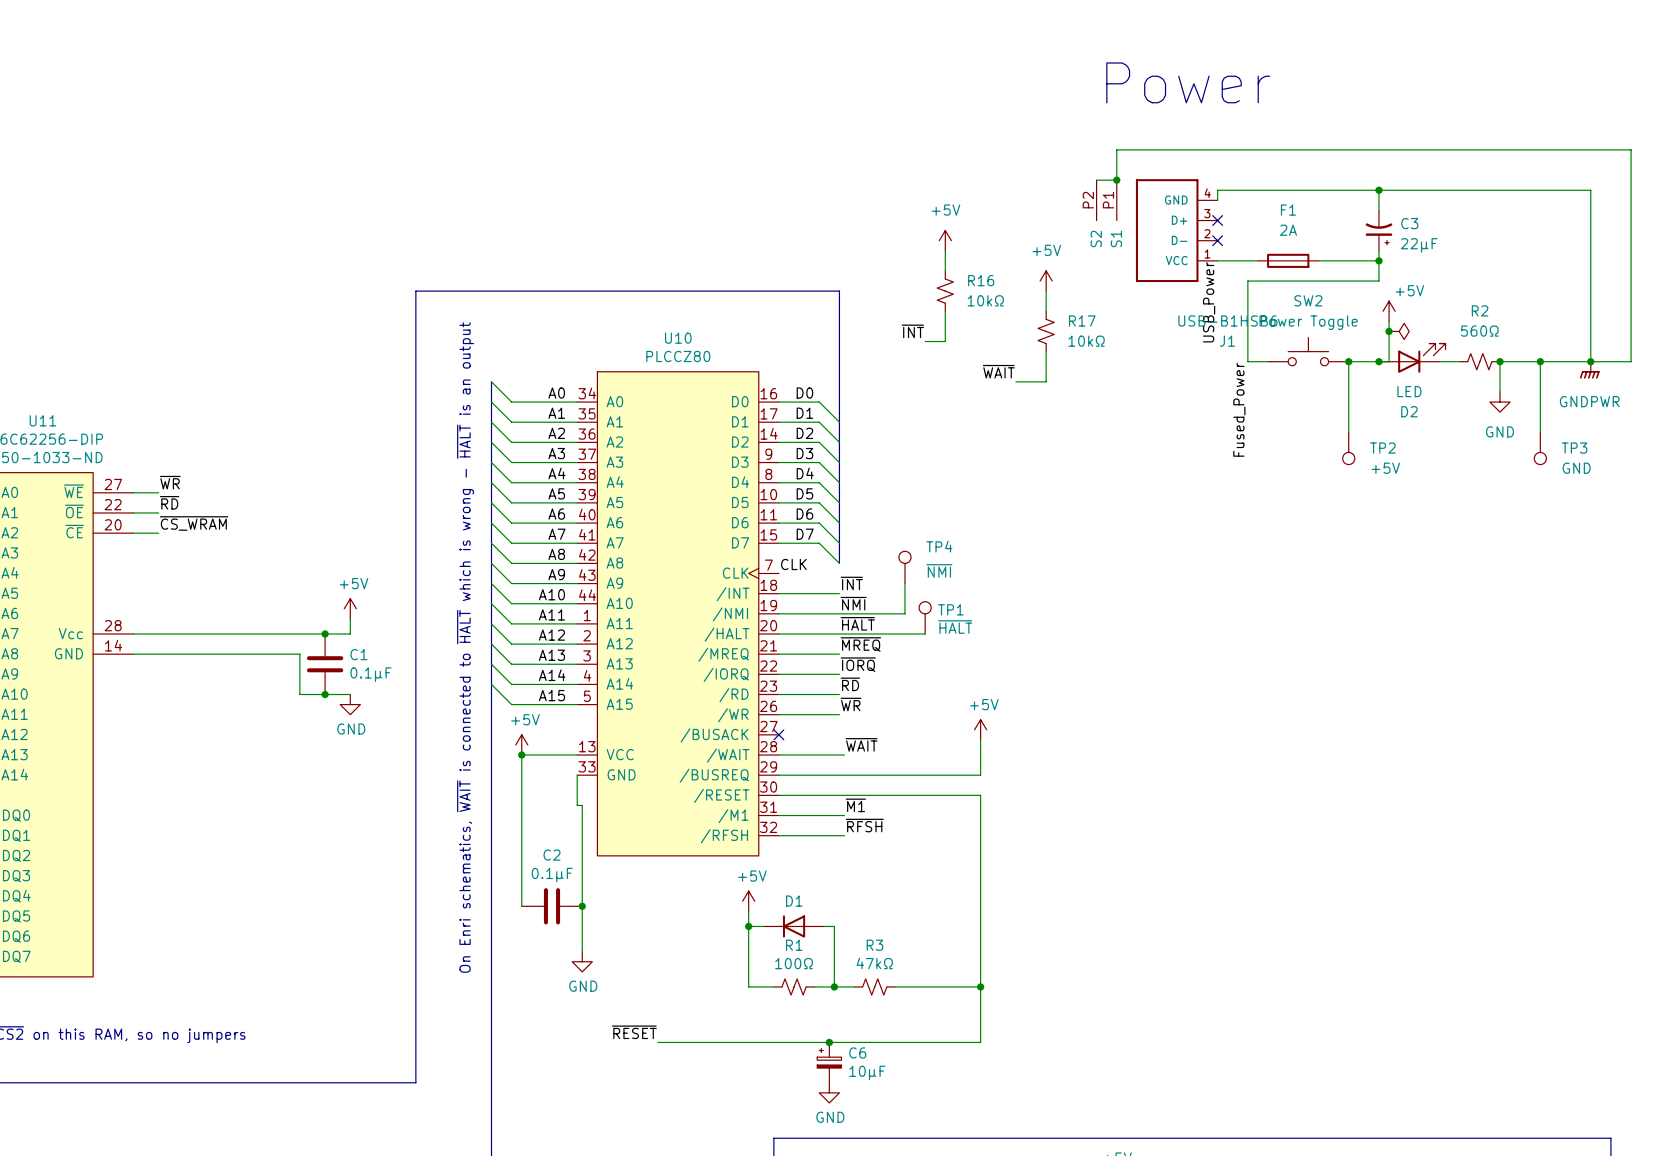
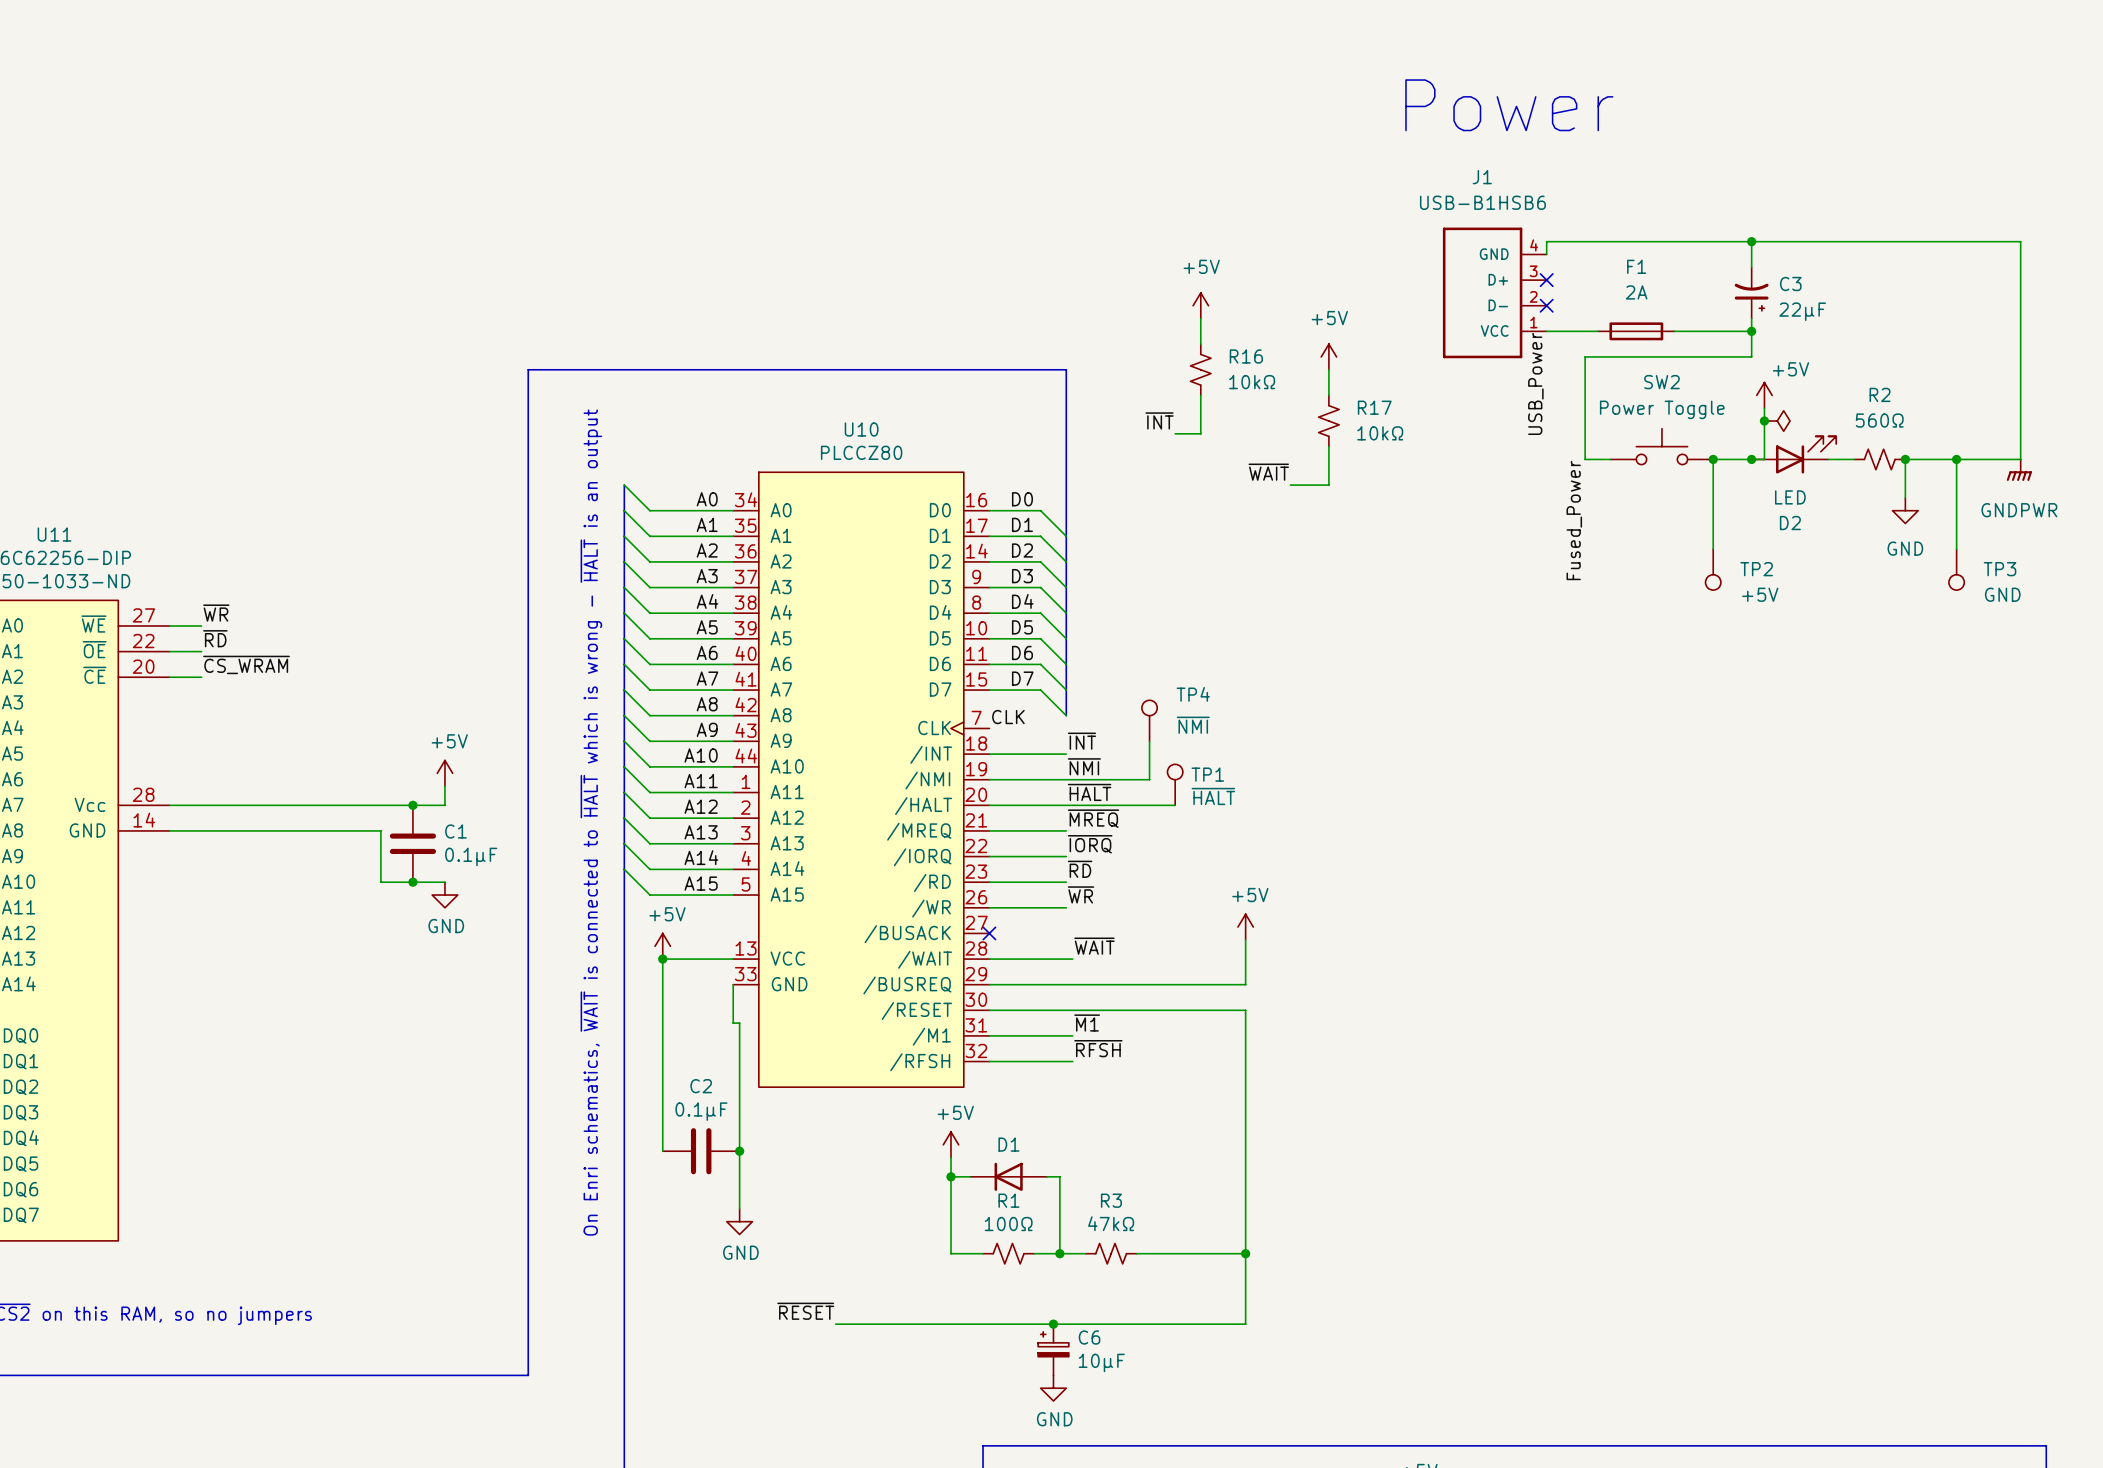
J1 symbol: [1096, 179, 1218, 283] -> [1442, 227, 1547, 359]
wire: (1096, 180) (1116, 180) (1116, 149) (1631, 149) (1631, 361) (1590, 361) -> none
junction: (1116, 180) -> none
J1 value position: USB-B1HSB6 (1227, 320) -> USB-B1HSB6 (1482, 202)
J1 name position: J1 (1227, 341) -> J1 (1482, 177)
junction: (1590, 361) -> none

